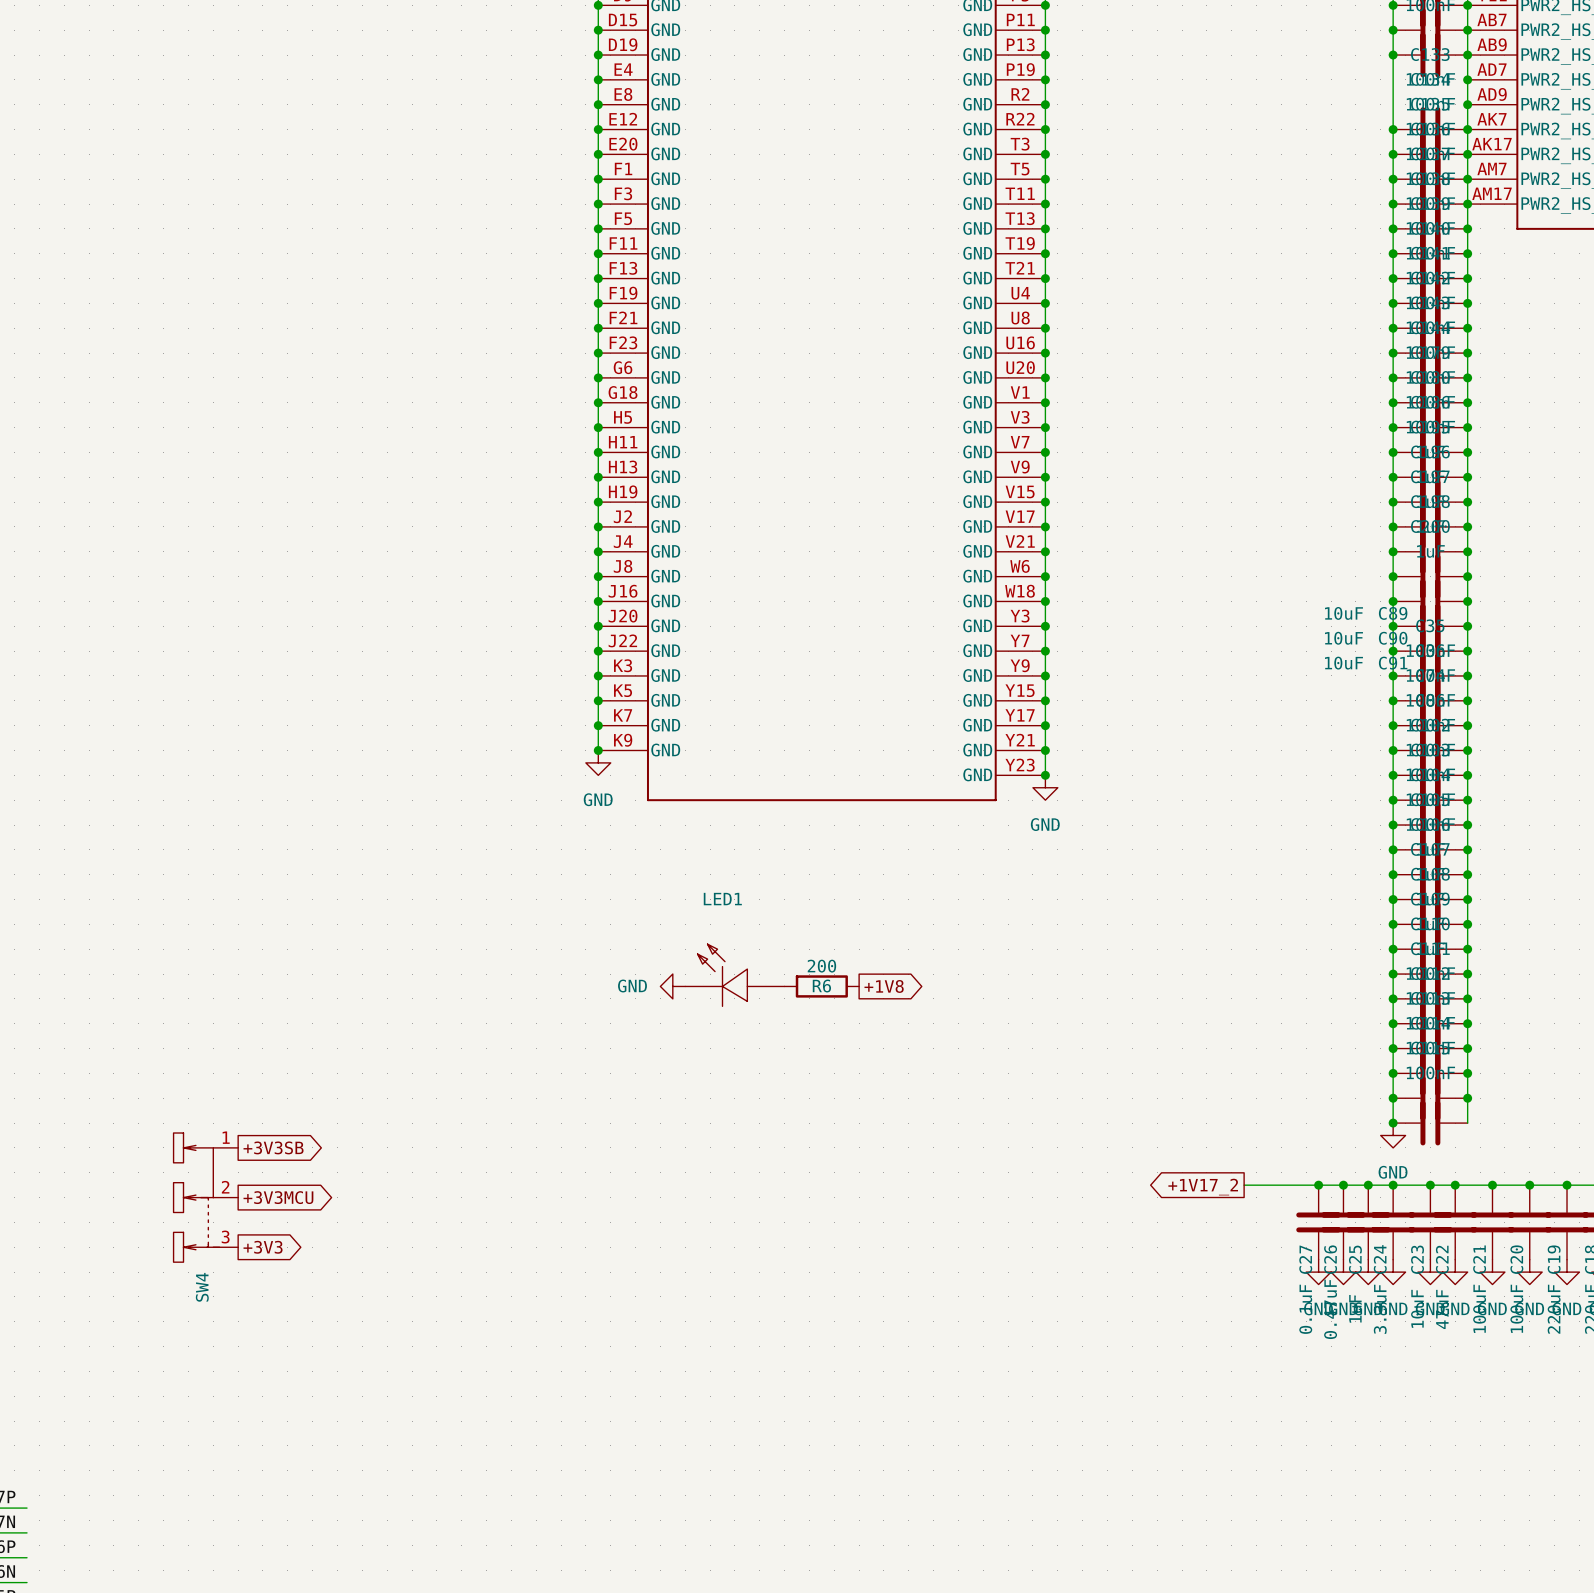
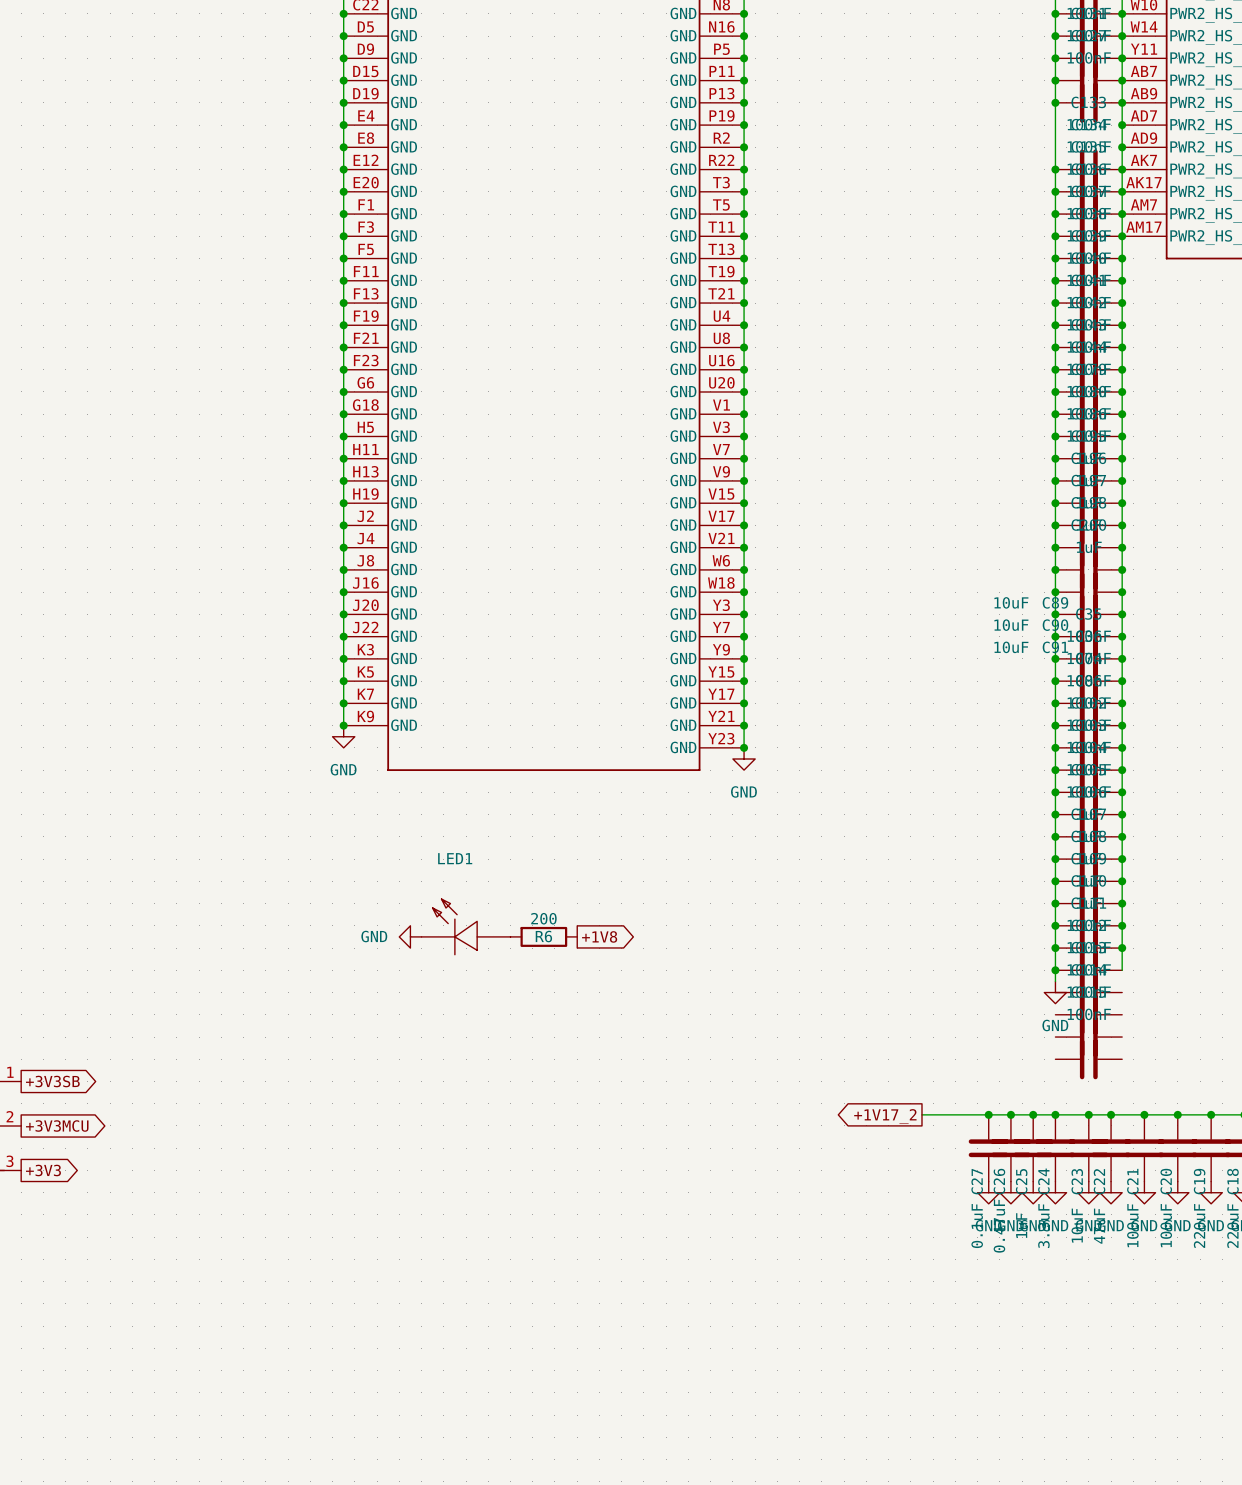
wire: (1467, 1023) (1467, 1123) -> none
junction: (1467, 1023) -> none
wire: (1393, 1036) (1393, 1123) -> none
junction: (1393, 1048) -> none
junction: (1467, 1048) -> none
junction: (1393, 1073) -> none
junction: (1467, 1073) -> none
junction: (1393, 1098) -> none
junction: (1467, 1098) -> none
junction: (1393, 1123) -> none
power symbol position: GND (1393, 1135) -> GND (1055, 992)

